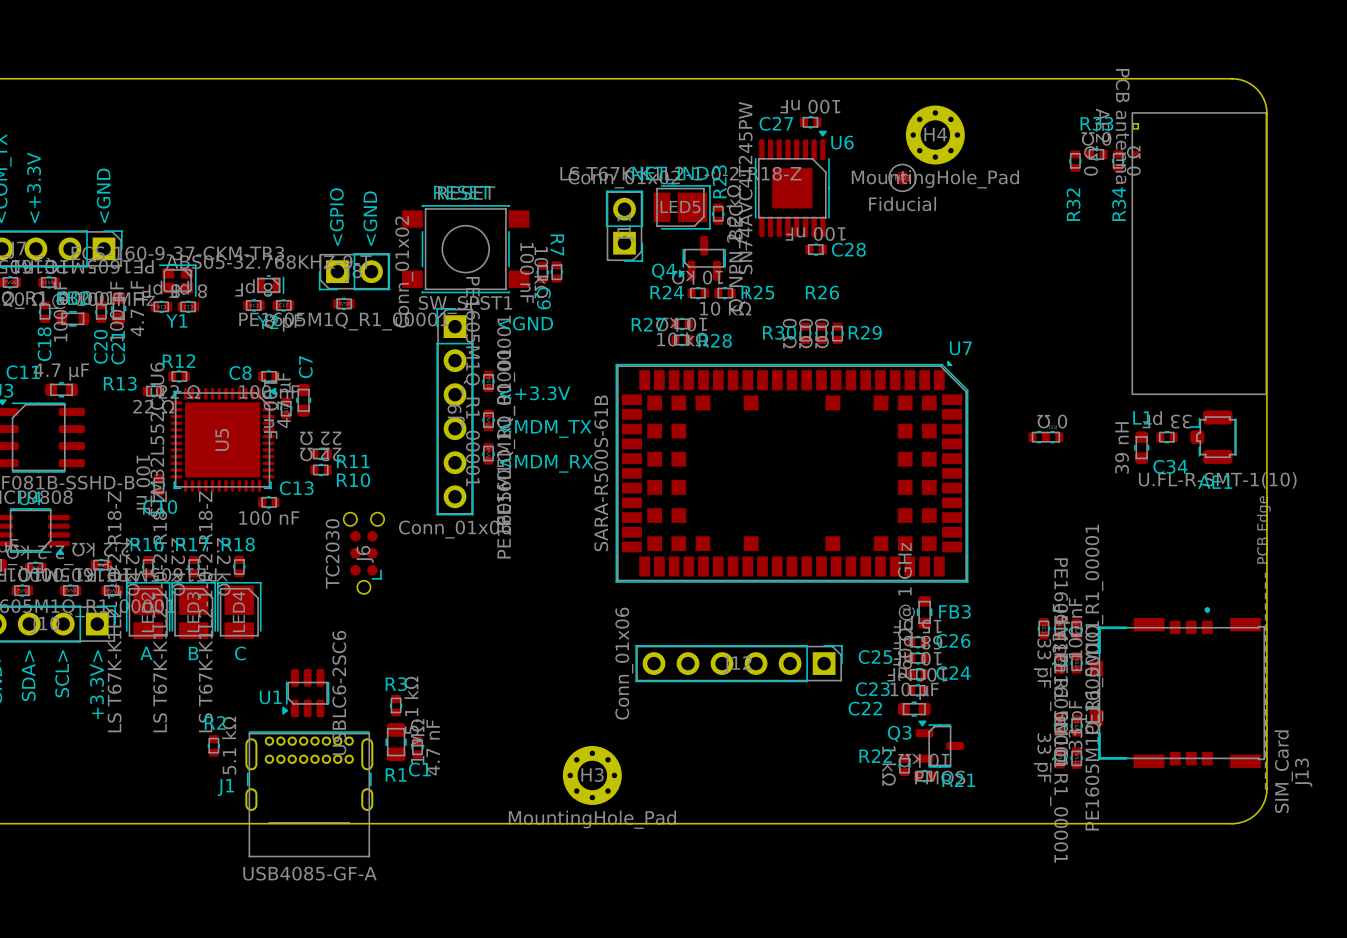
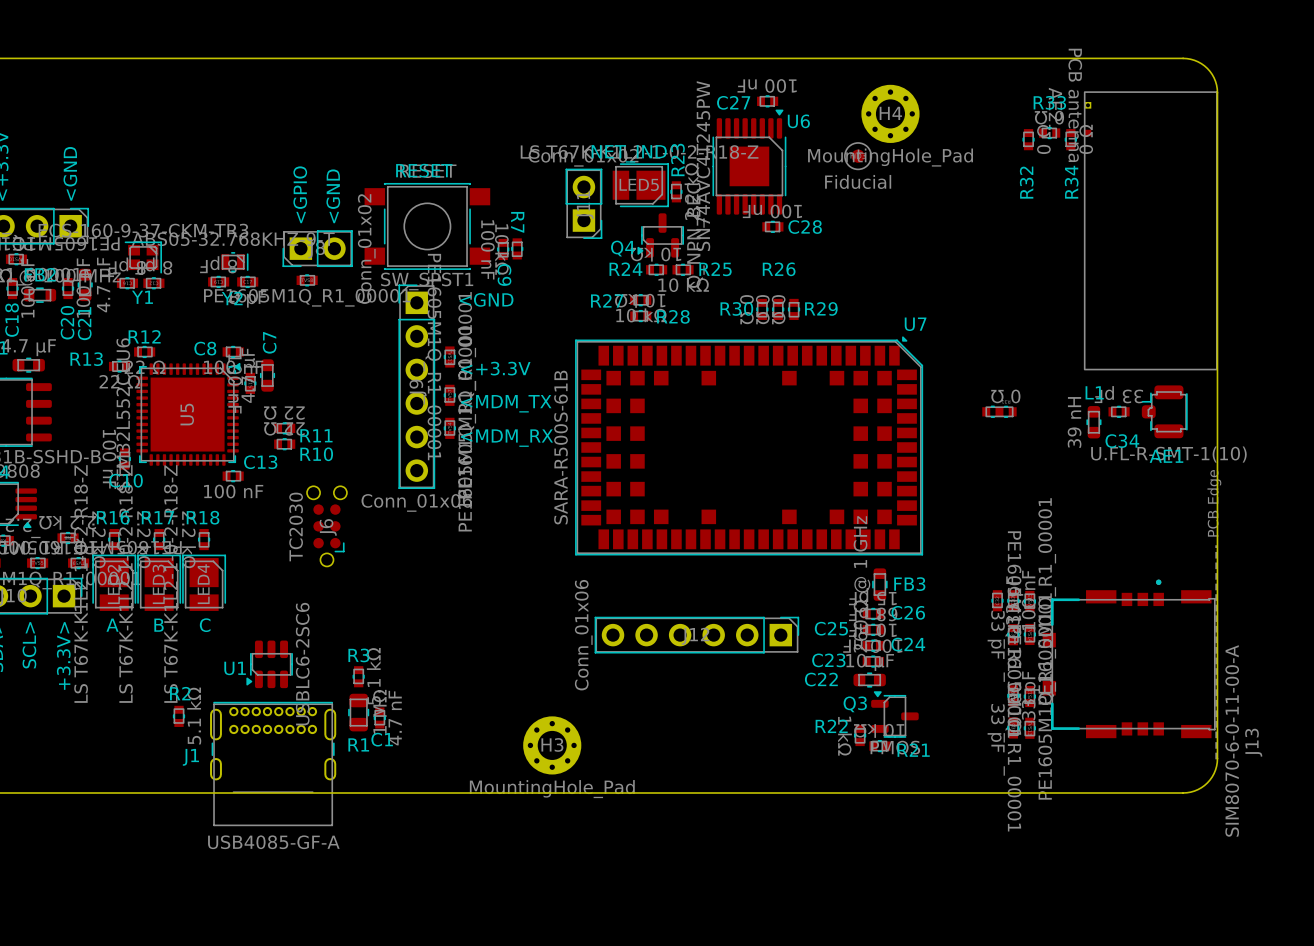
J13 value: SIM_Card (1283, 771) -> SIM8070-6-0-11-00-A (1232, 740)

